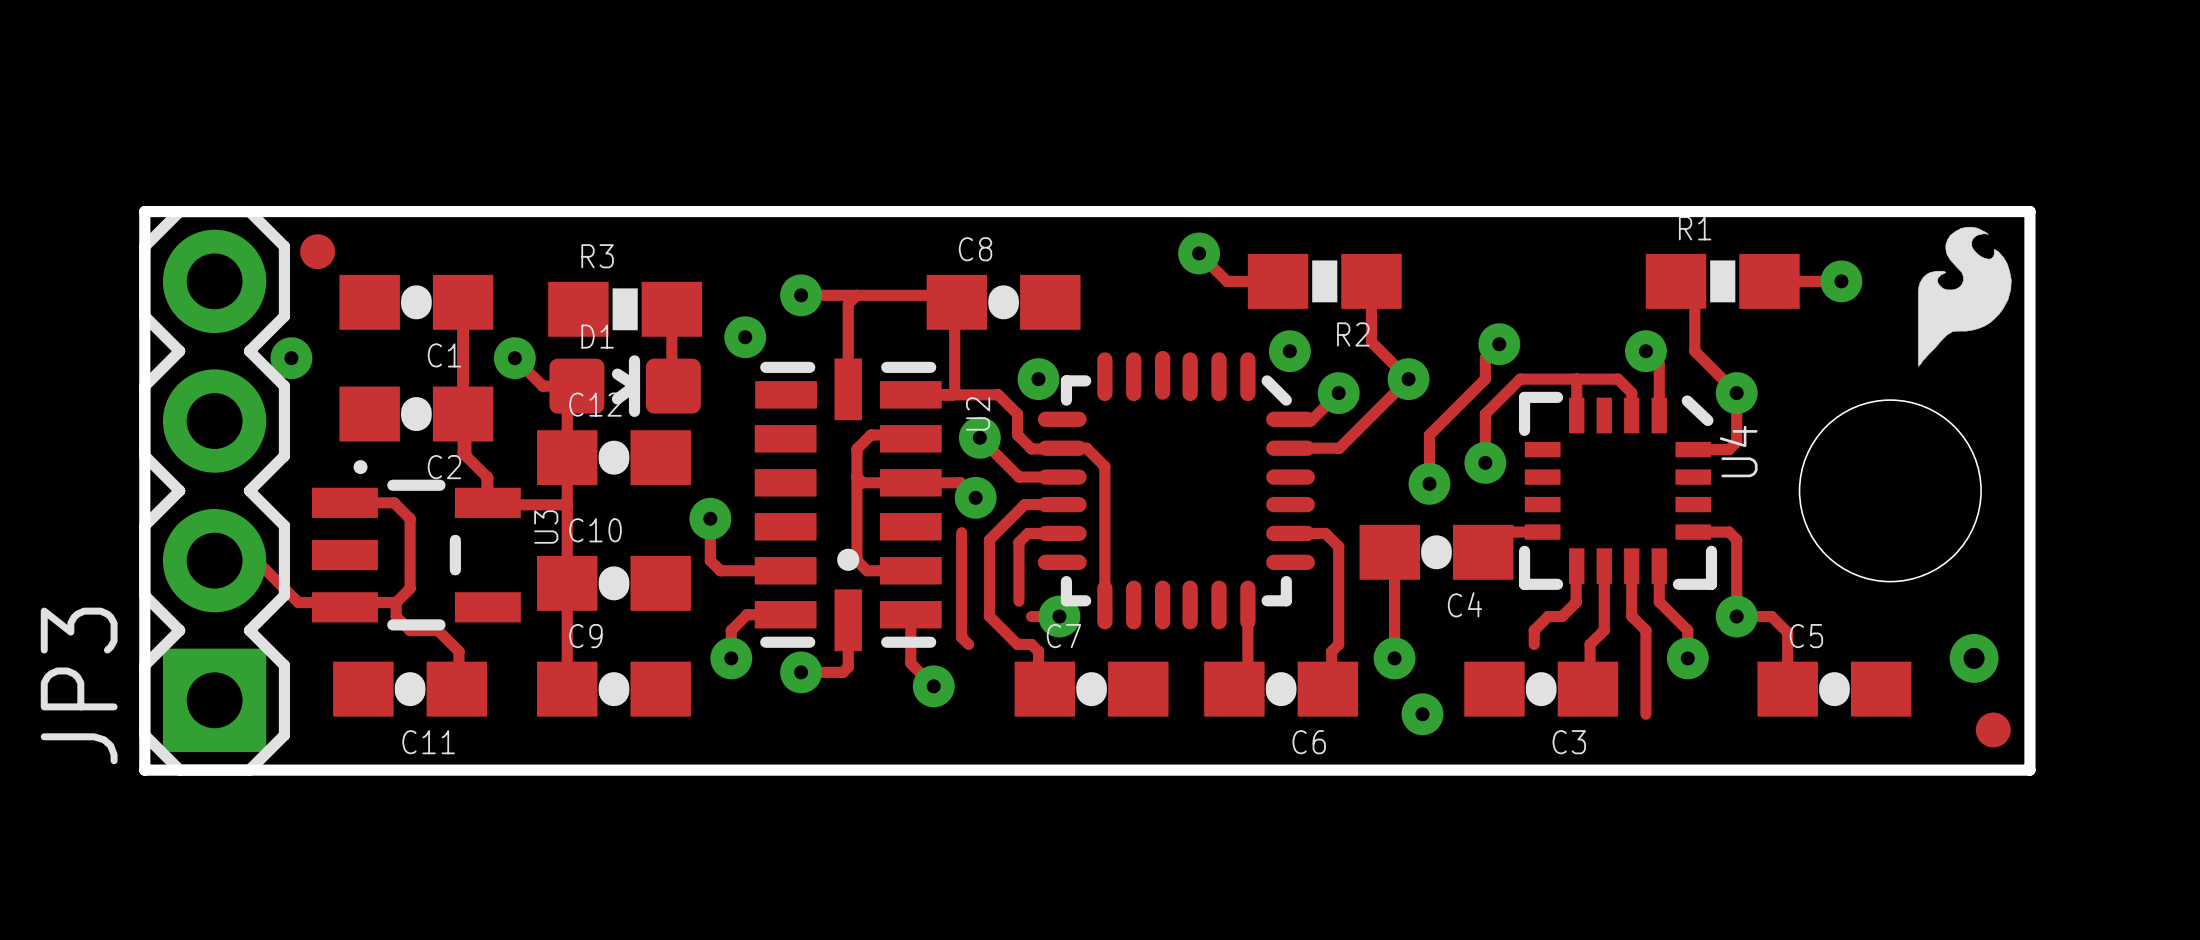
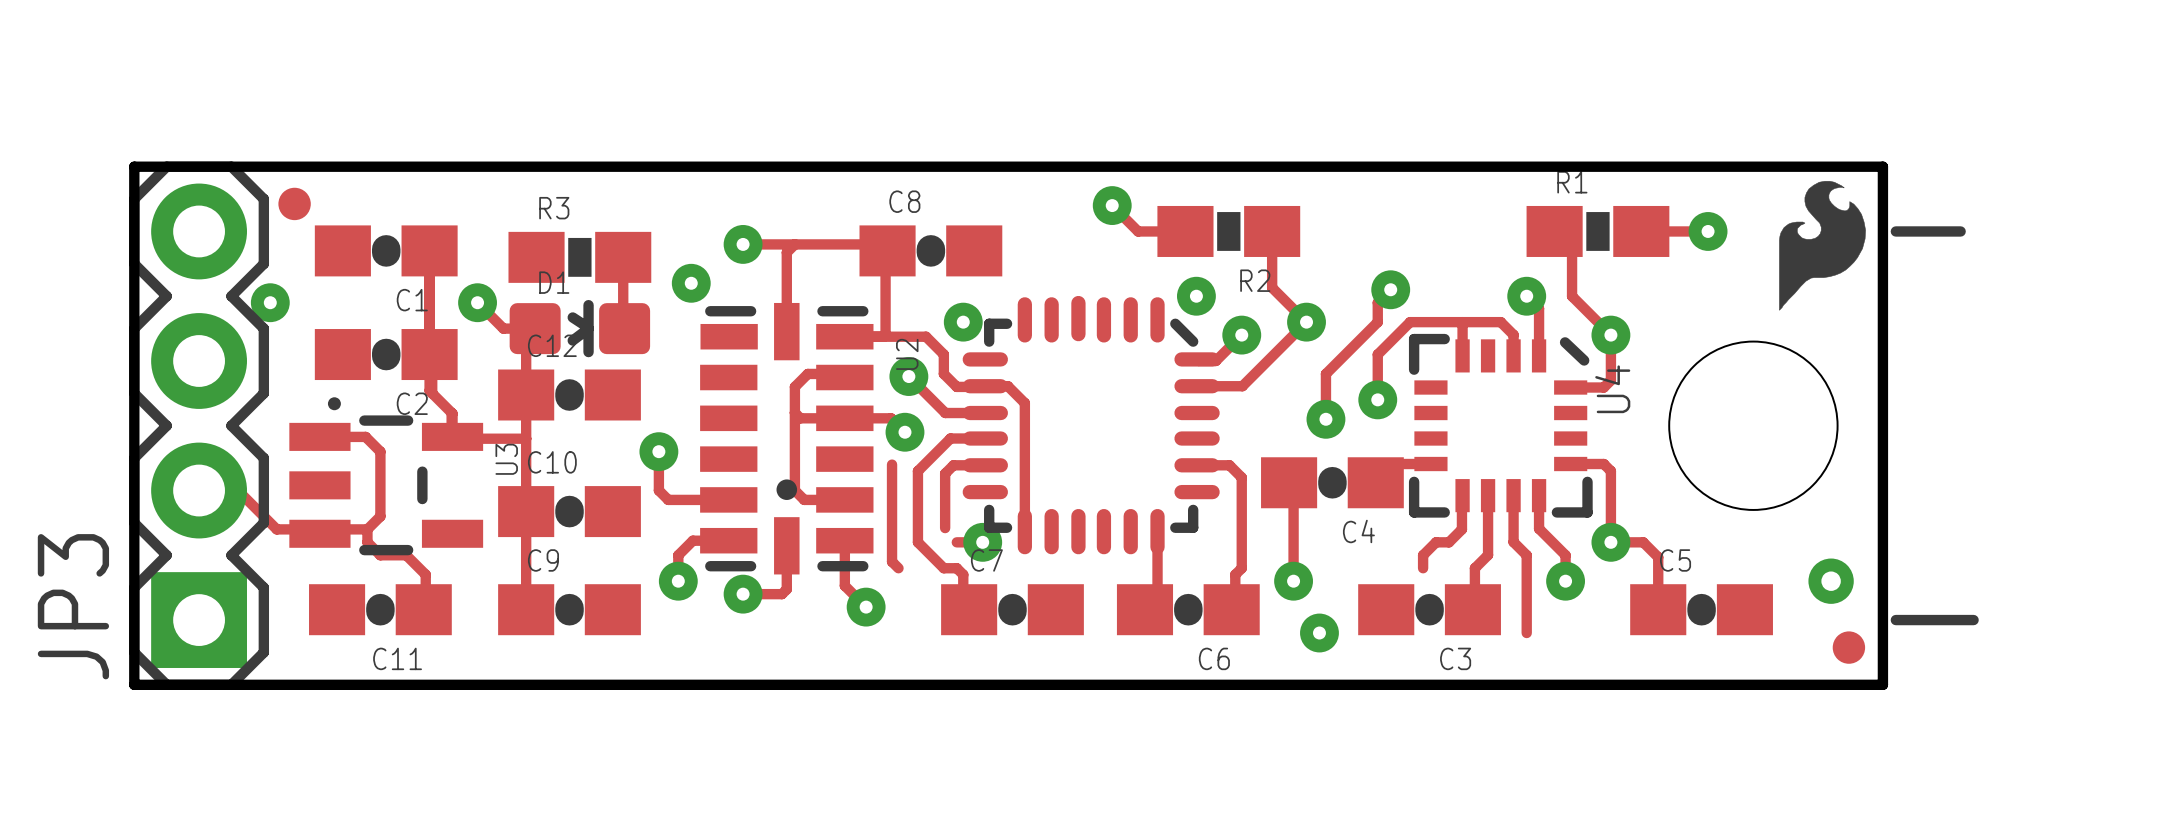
line: none -> (1895, 231) (1960, 231)
line: none -> (1895, 620) (1973, 620)

